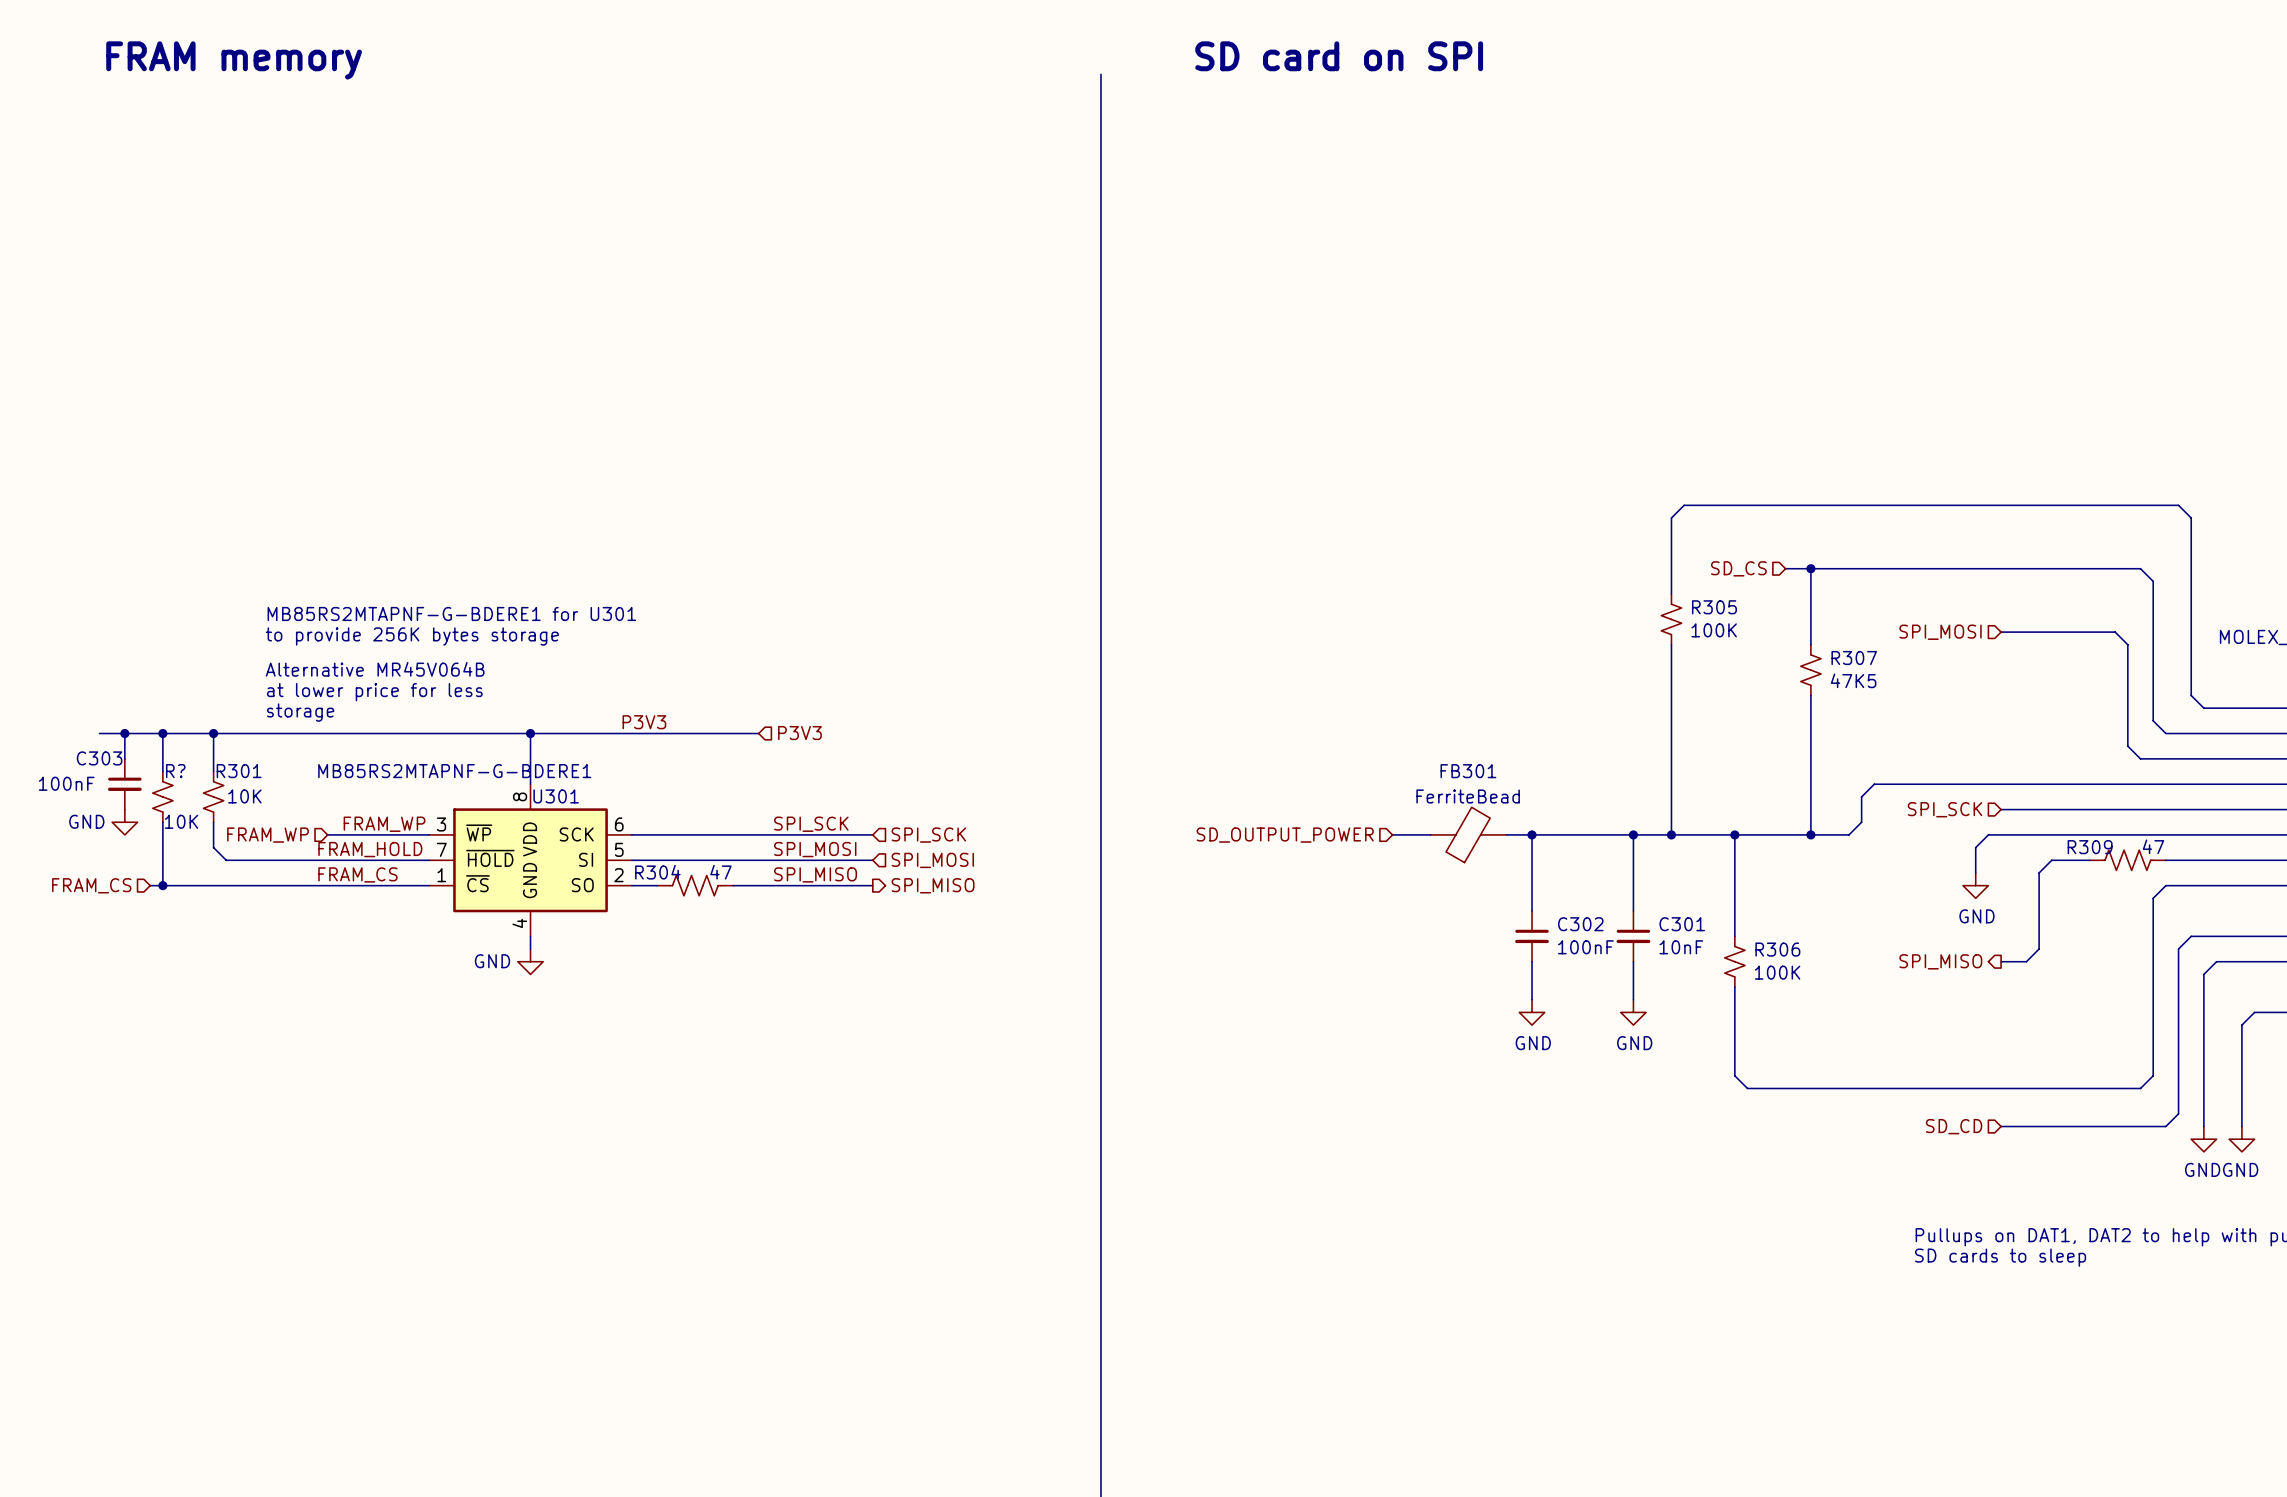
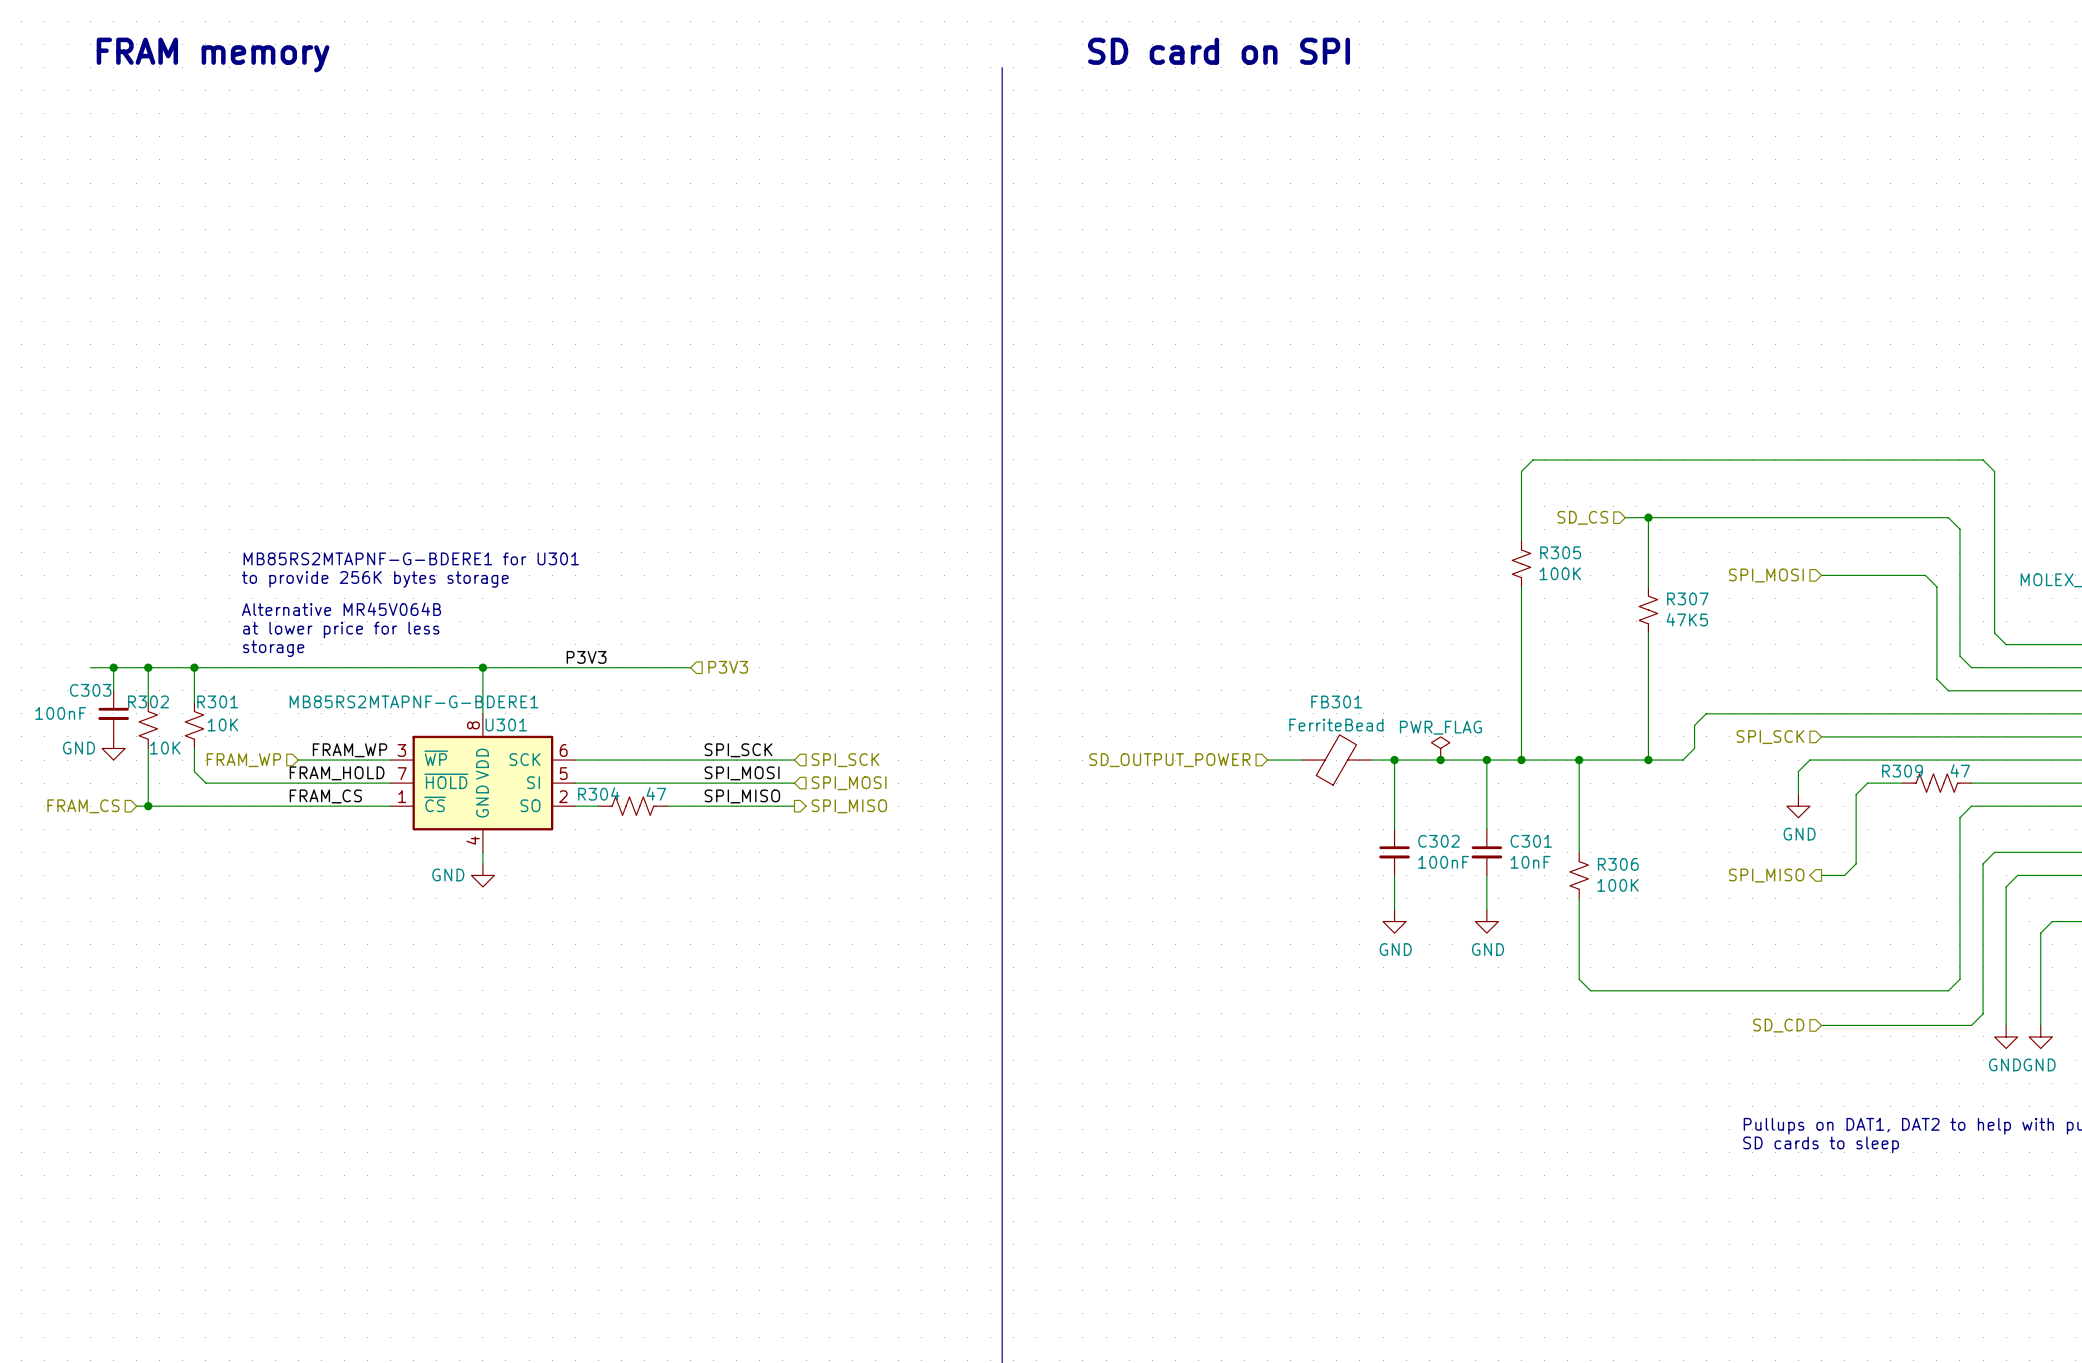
R? name: R? (175, 771) -> R302 (148, 701)
power symbol: none -> PWR_FLAG (1440, 748)
junction: none -> (1440, 760)

